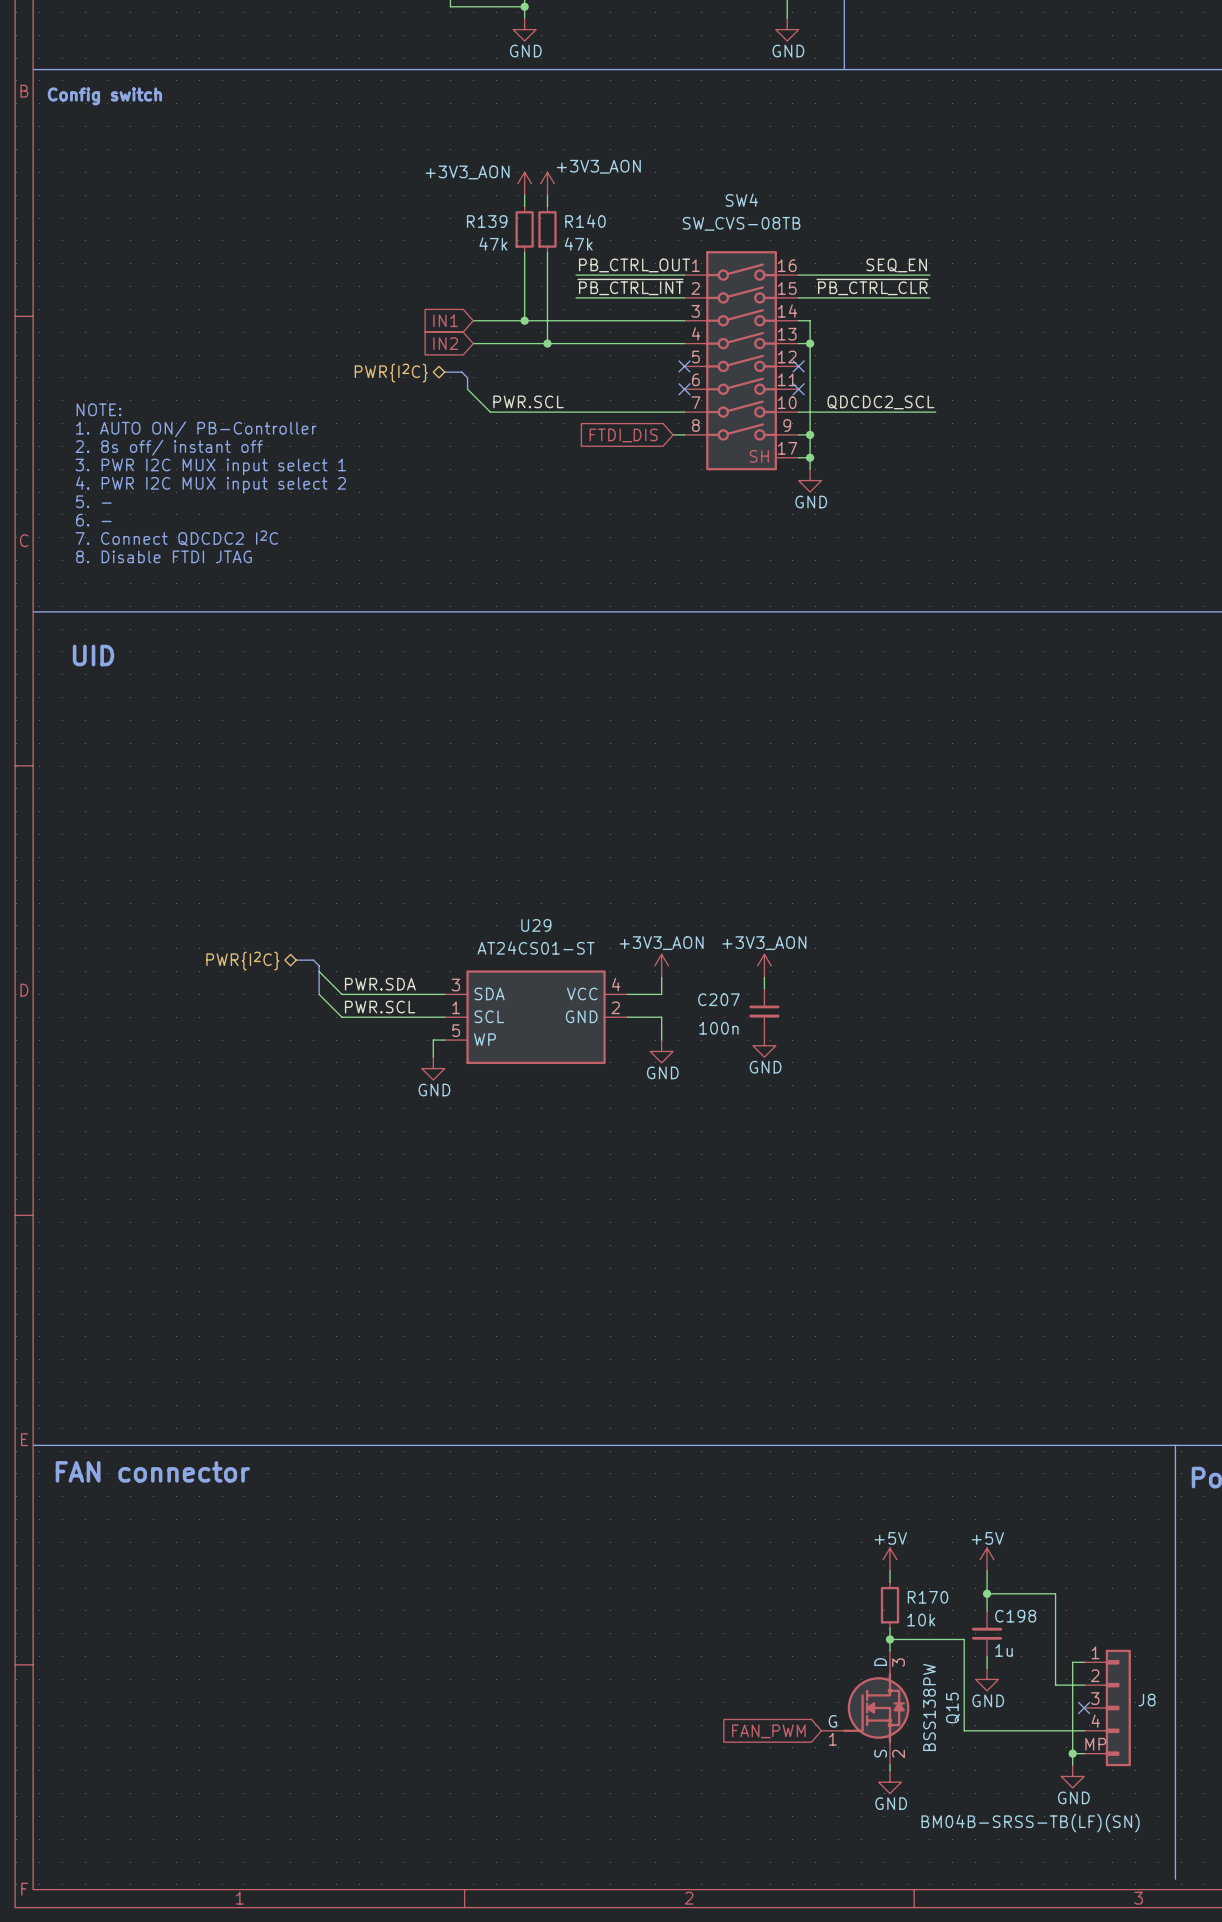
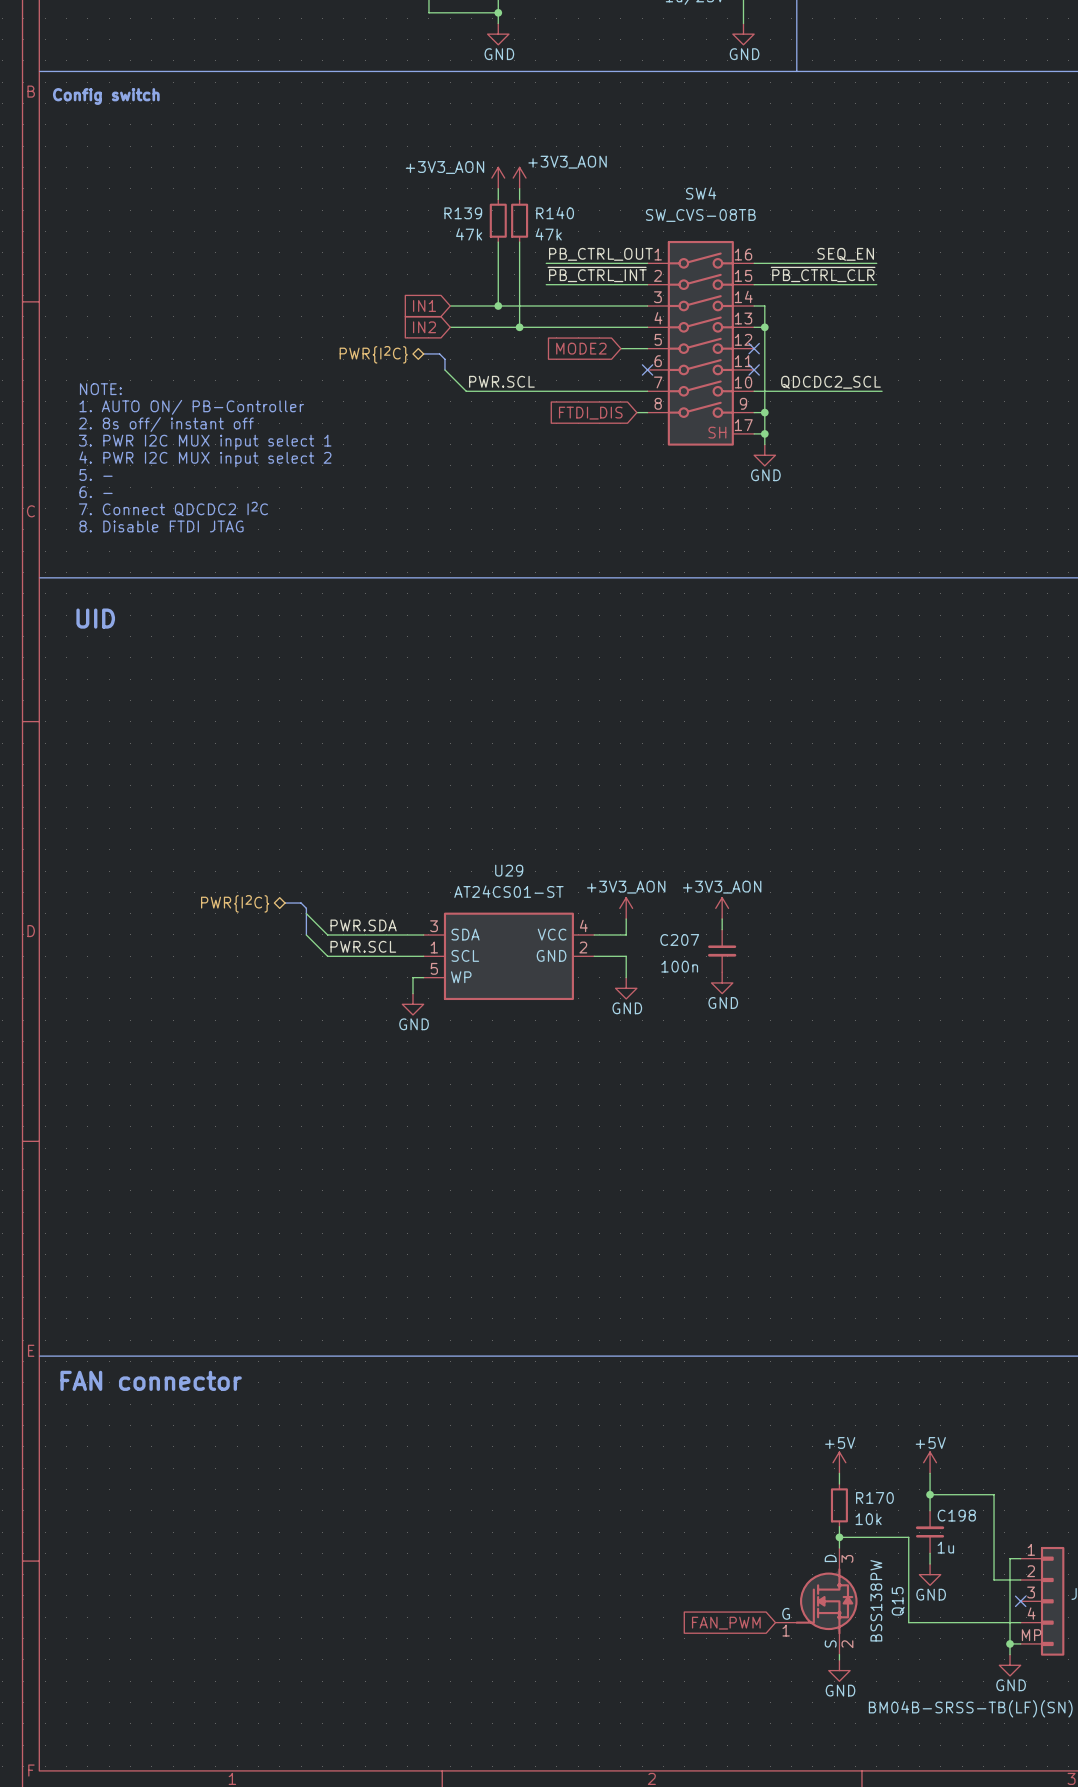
global label: none -> MODE2 (581, 348)
wire: none -> (620, 348) (647, 348)
no-connect mark: (684, 366) -> none

